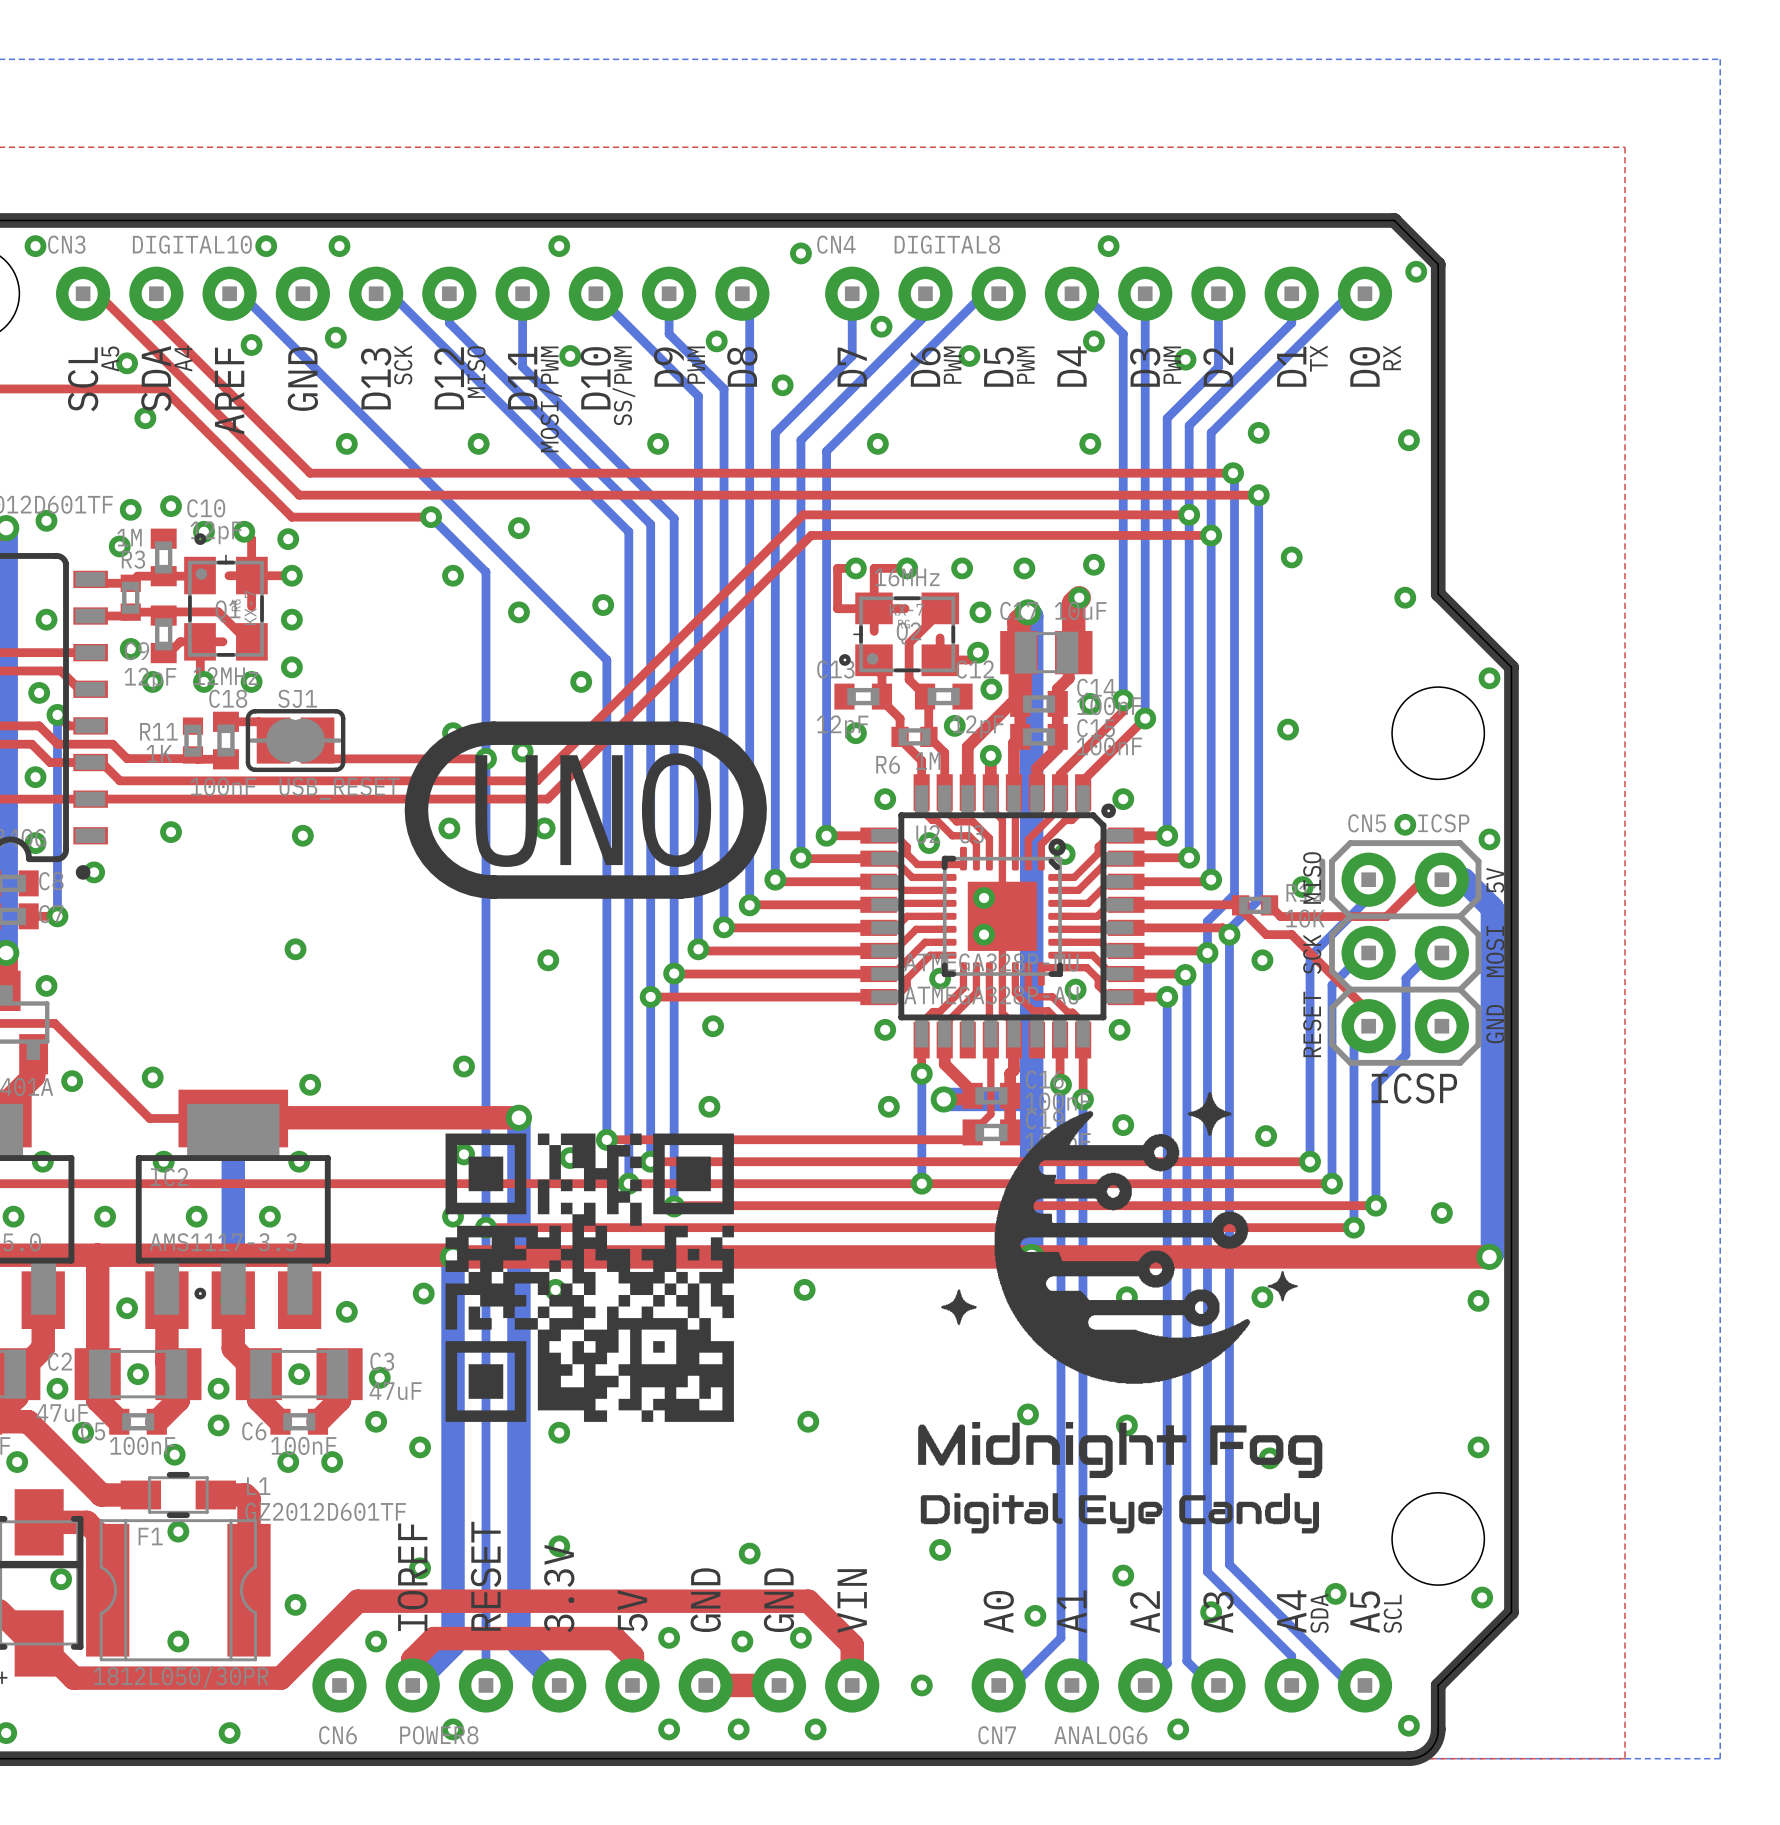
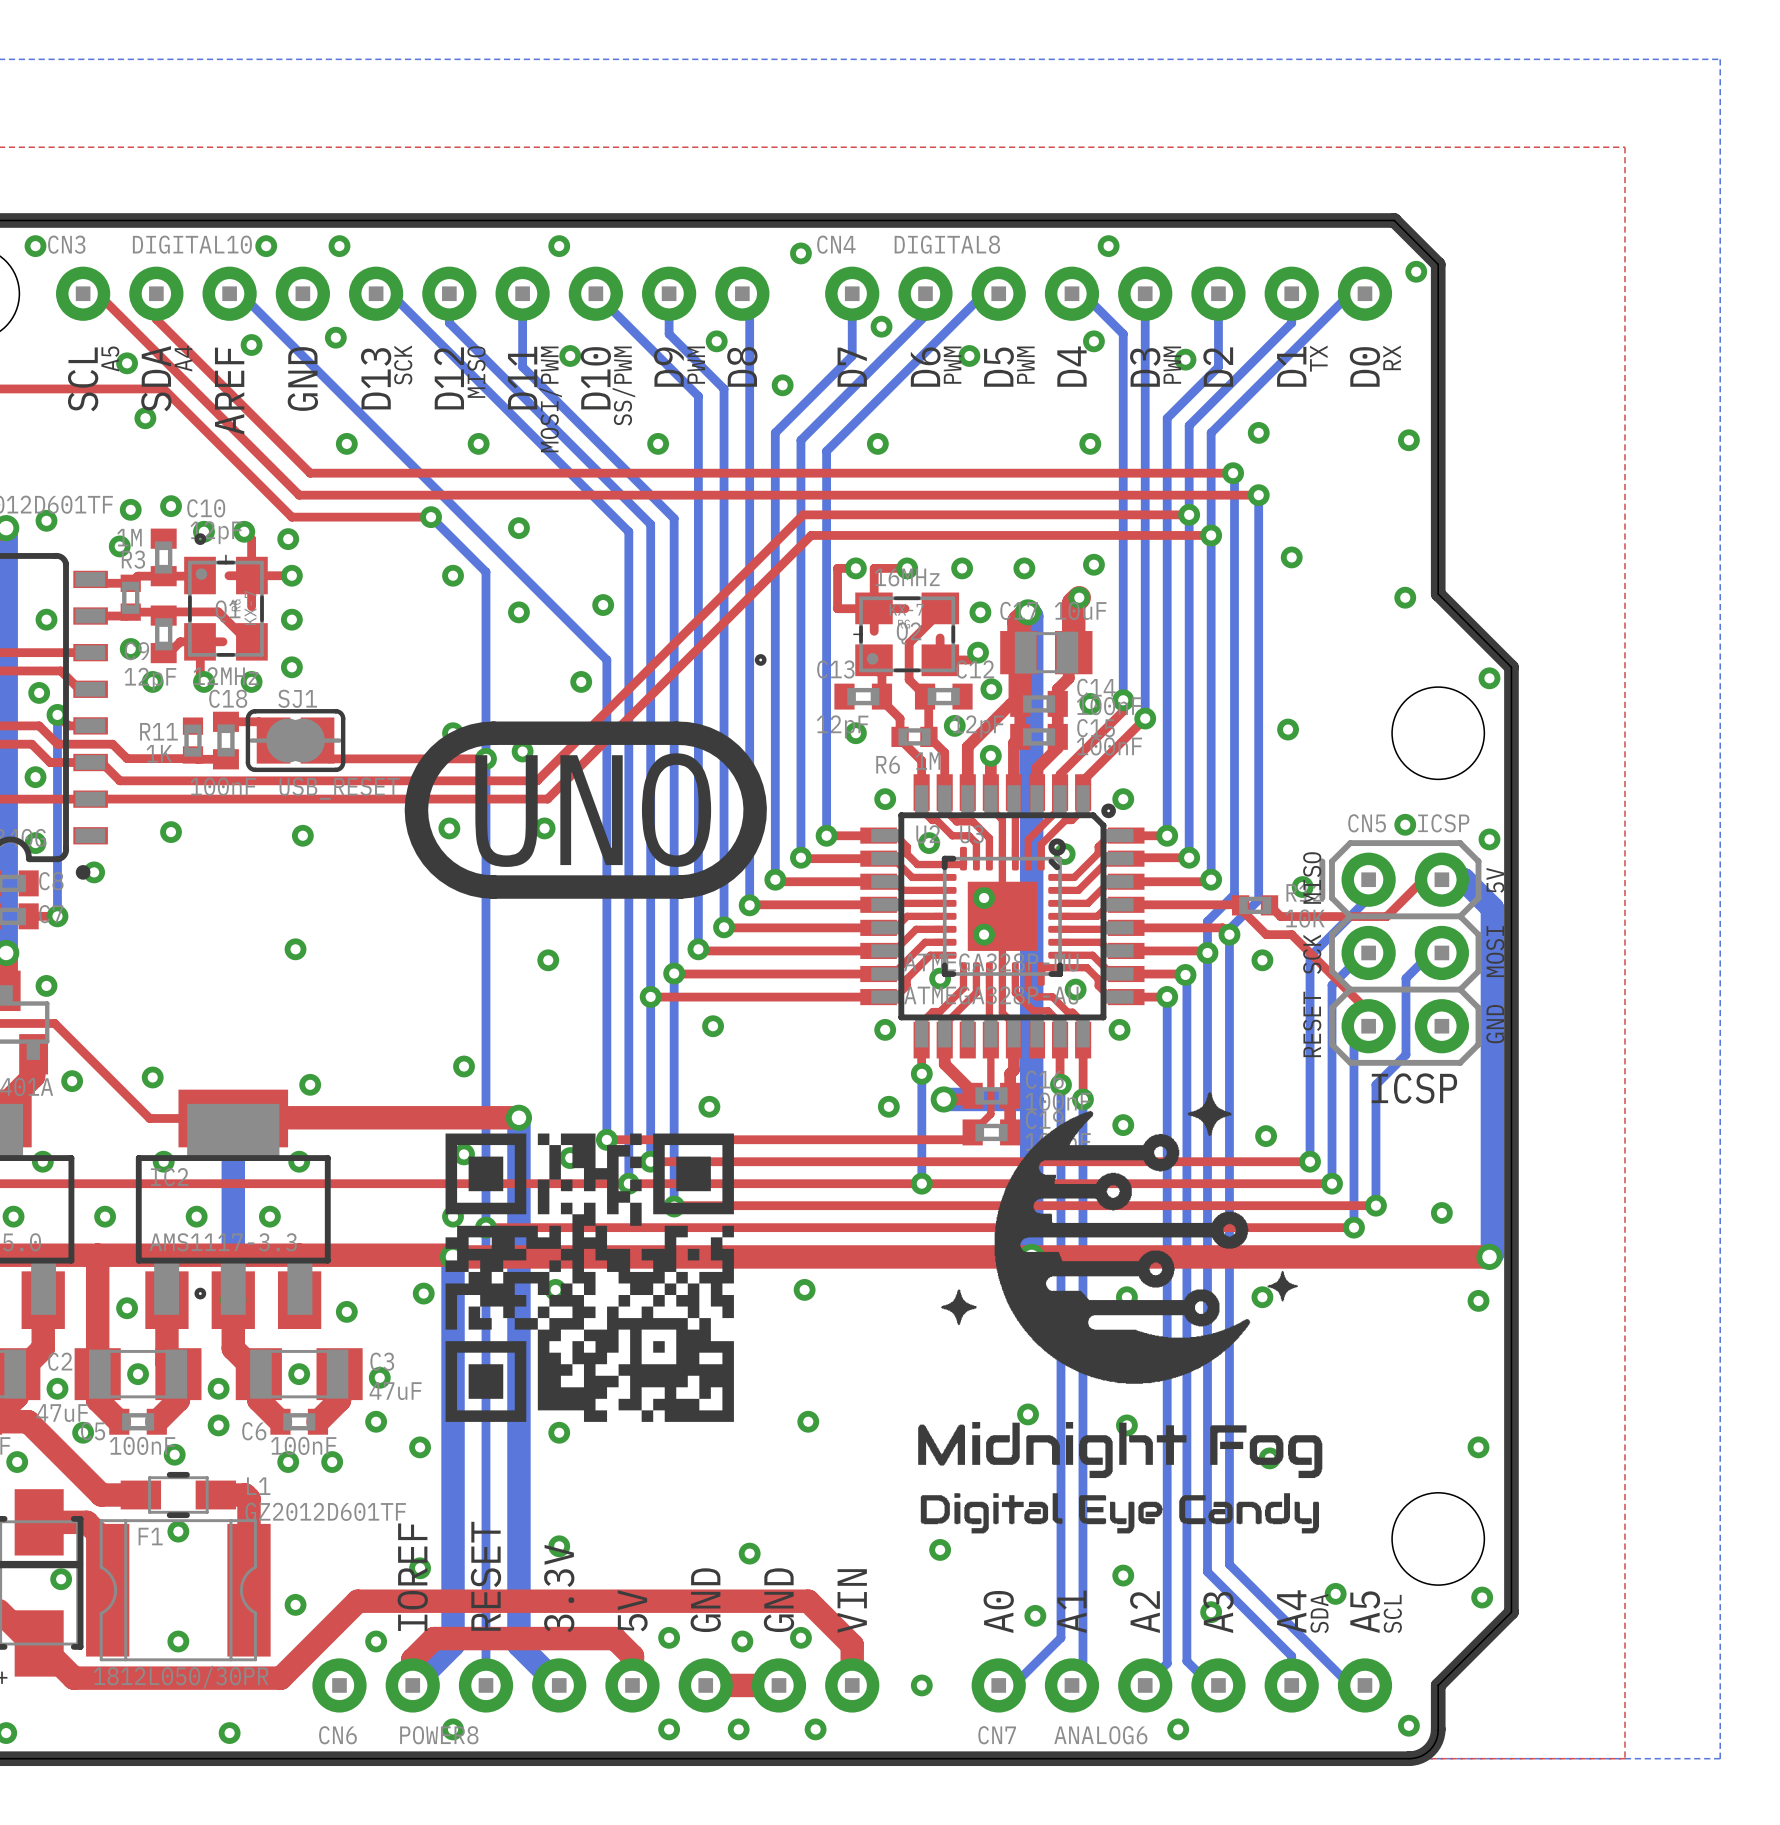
drawing position: (844, 659) -> (760, 659)

